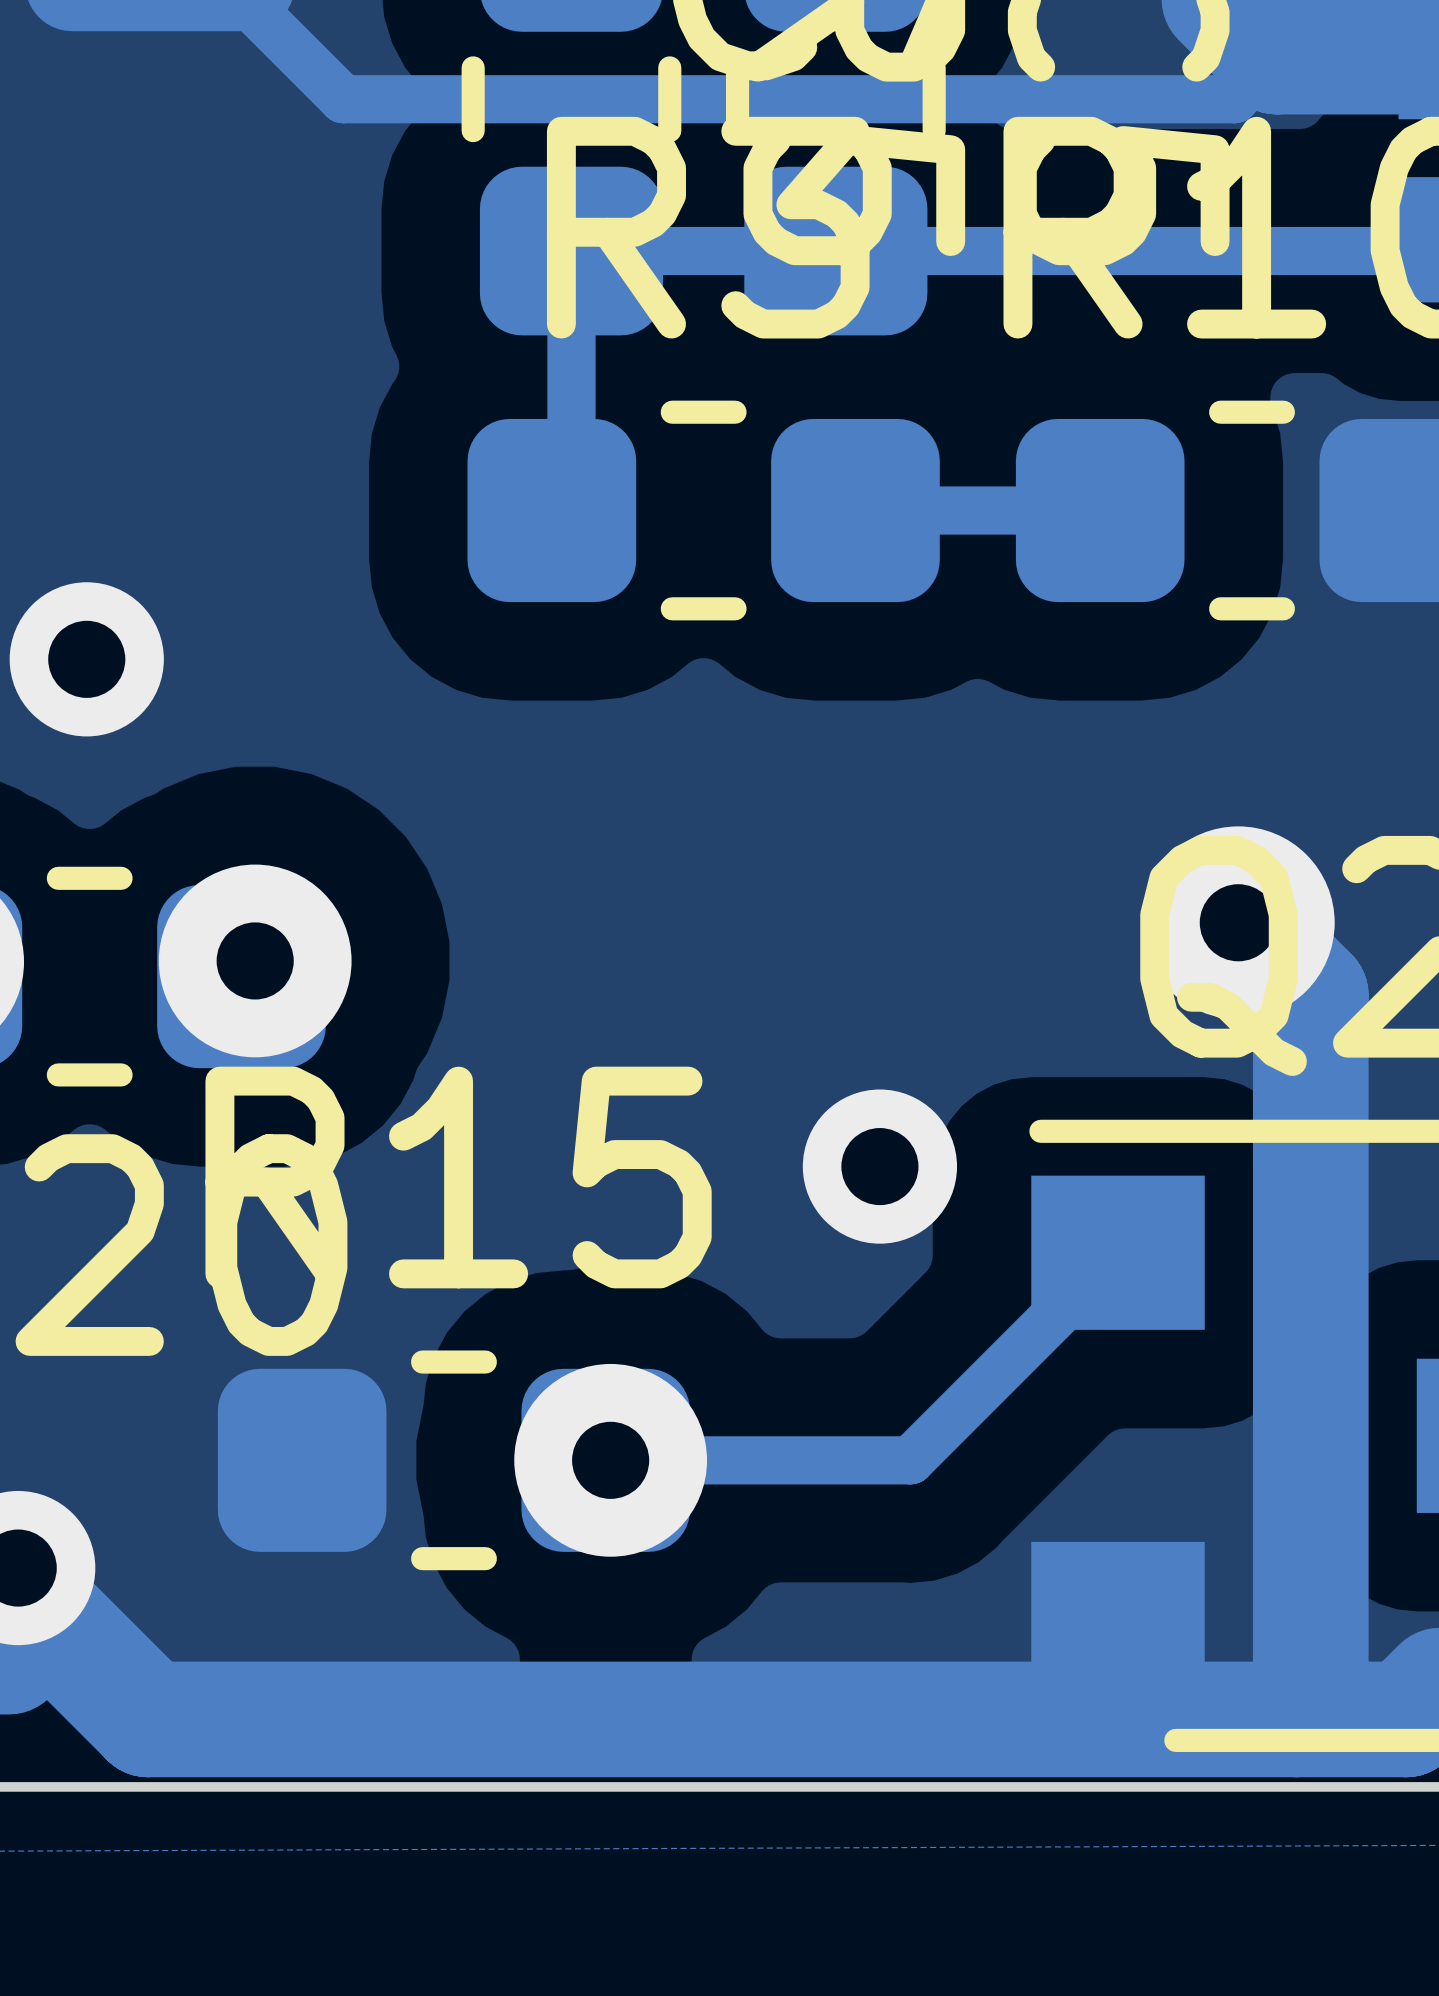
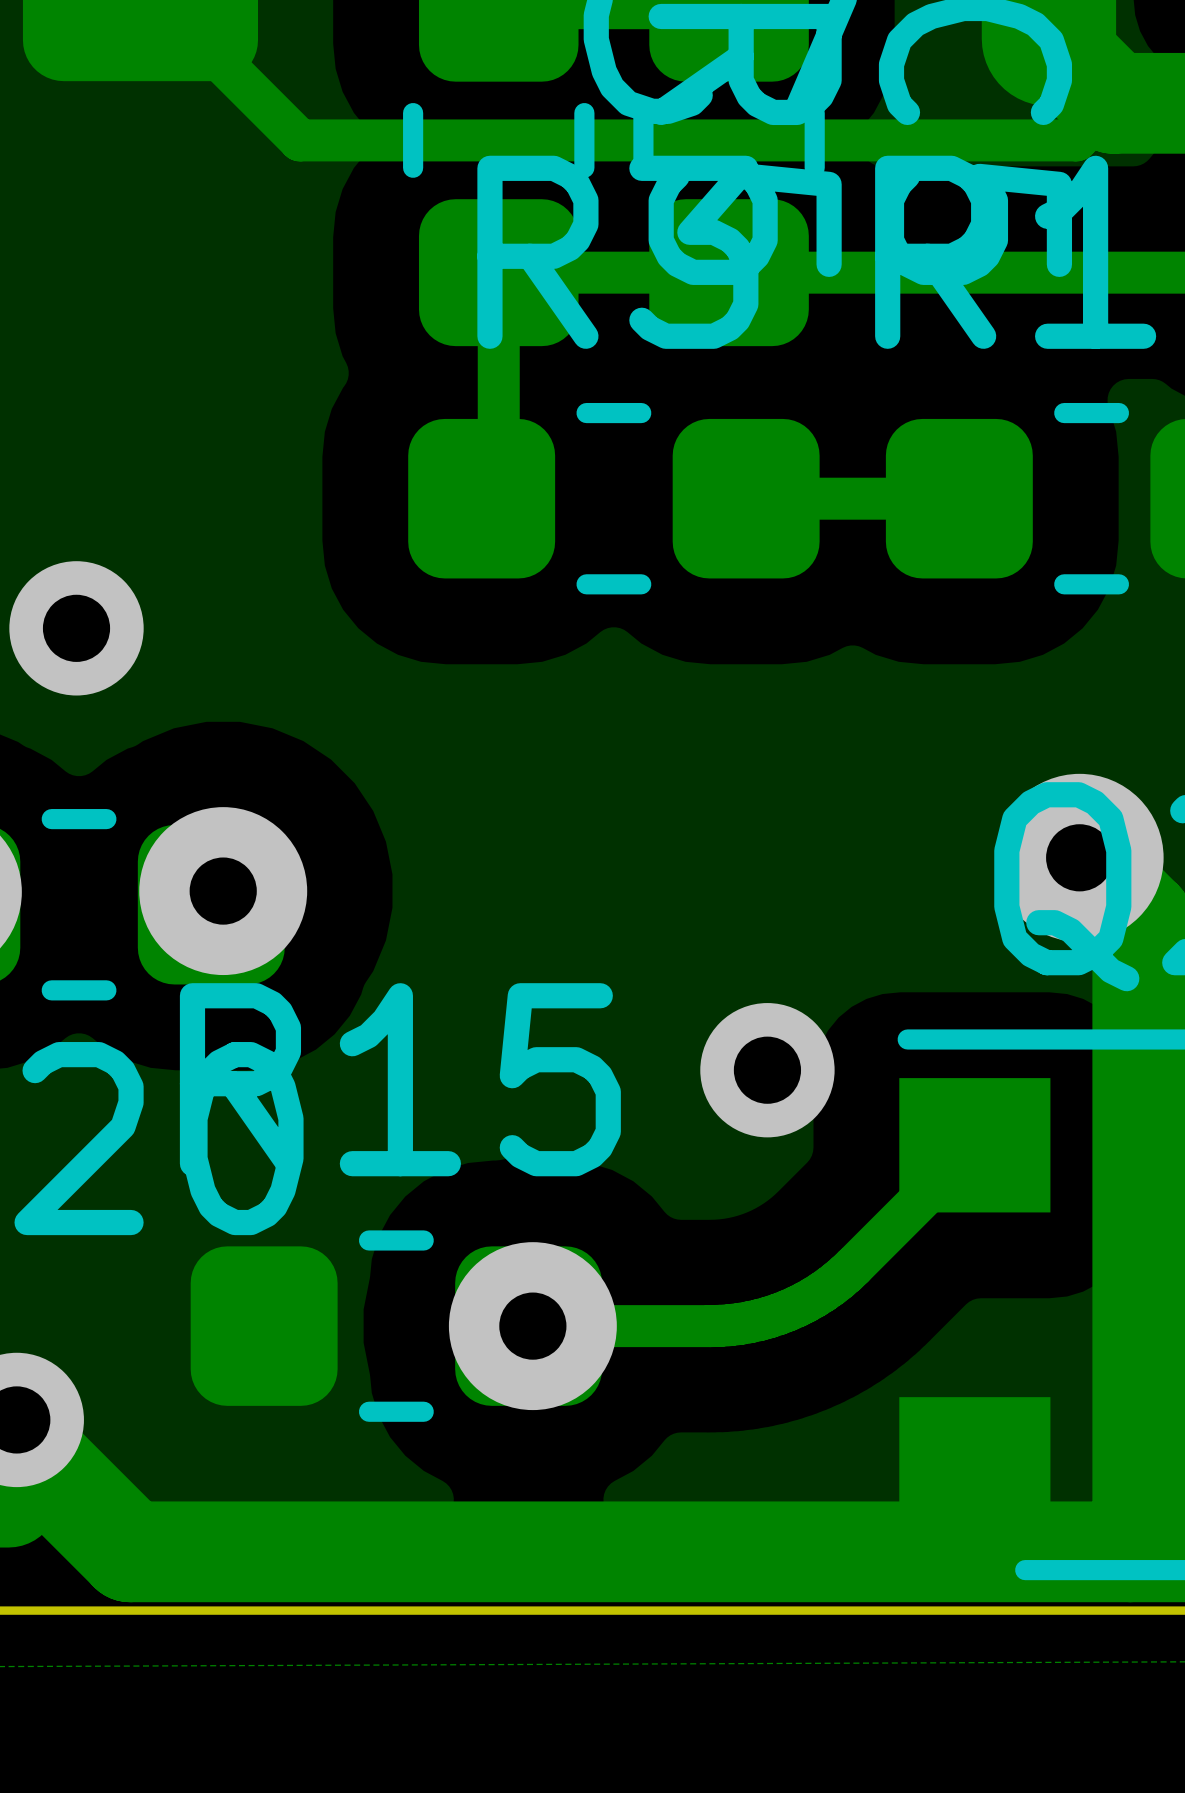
track: (978, 1392) (910, 1460) (814, 1460) -> (853, 1266) (822, 1291) (787, 1310) (749, 1322) (710, 1326)

